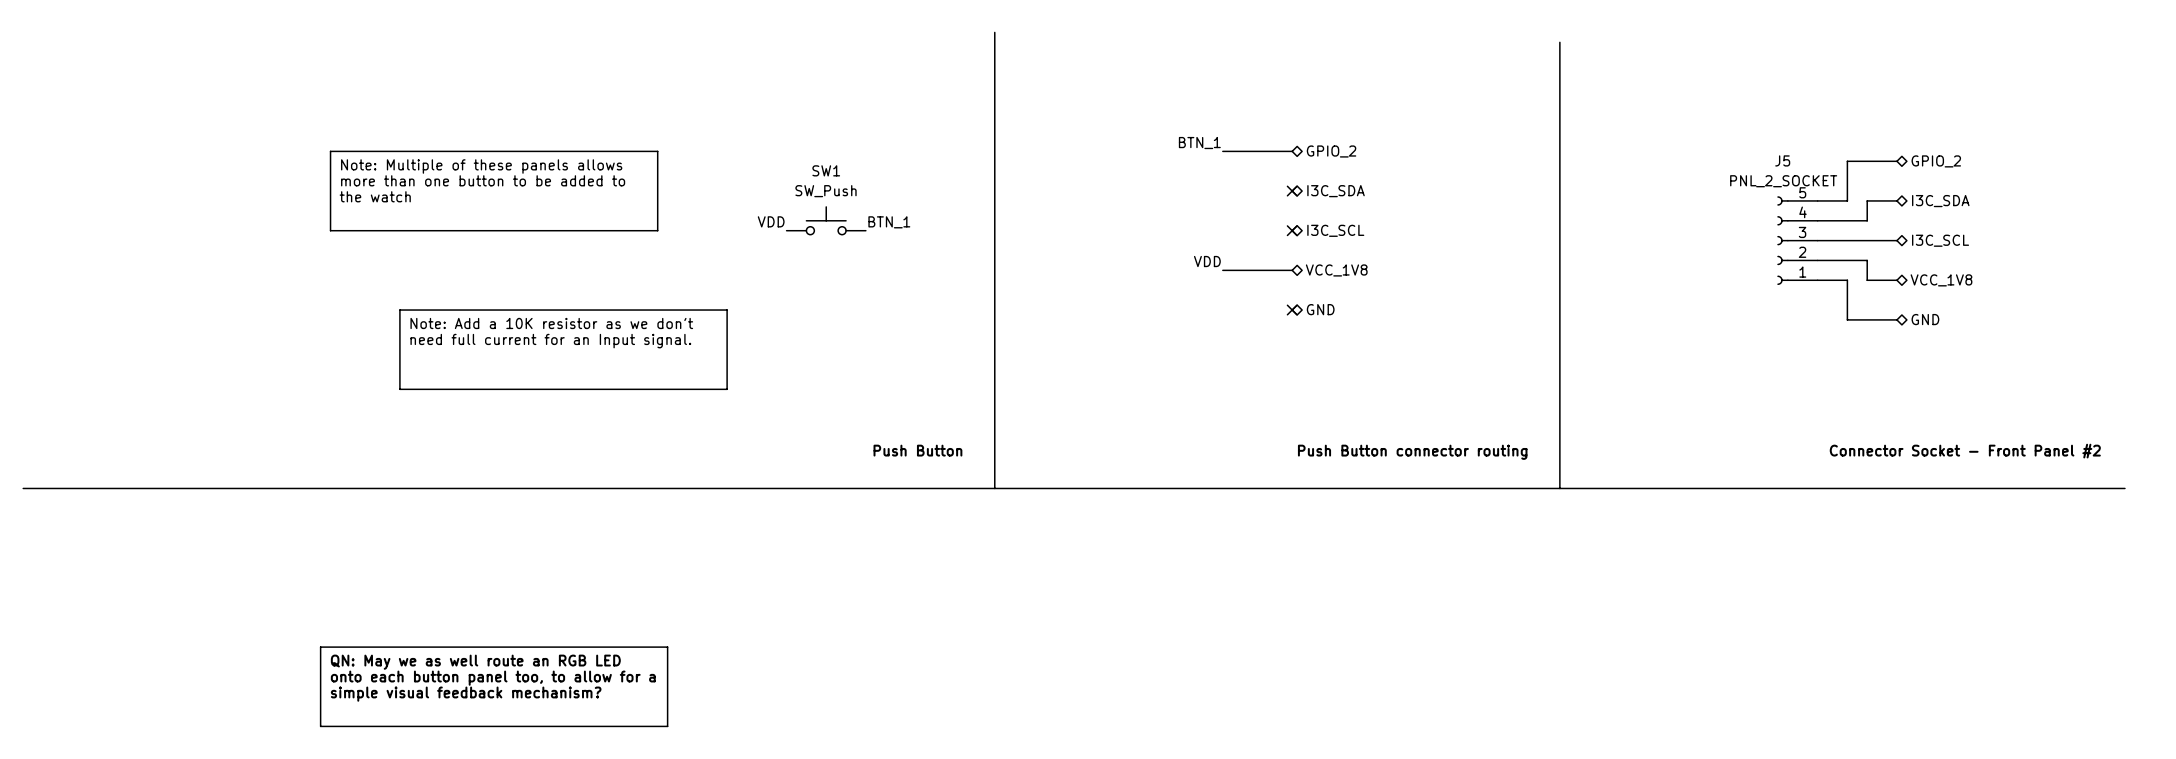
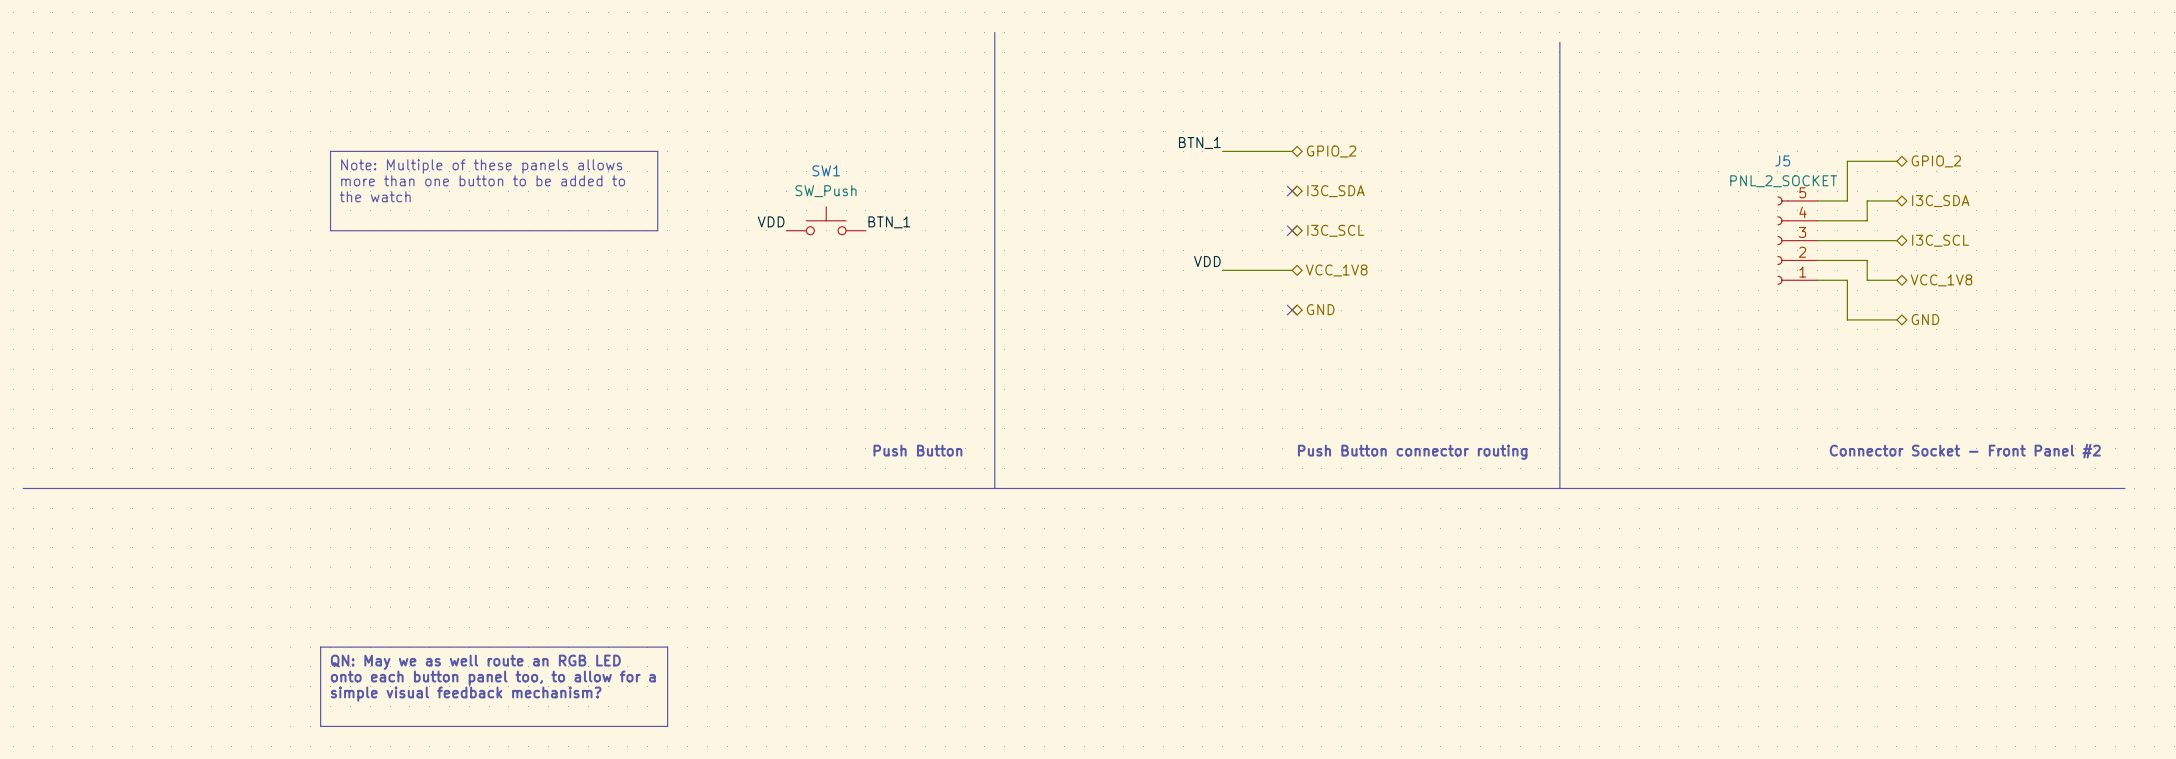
line: (399, 310) (727, 310) (727, 389) (399, 389) (399, 310) -> none
text: Note: Add a 10K resistor as we don't (551, 323) -> none
text: need full current for an Input signal. (550, 341) -> none

